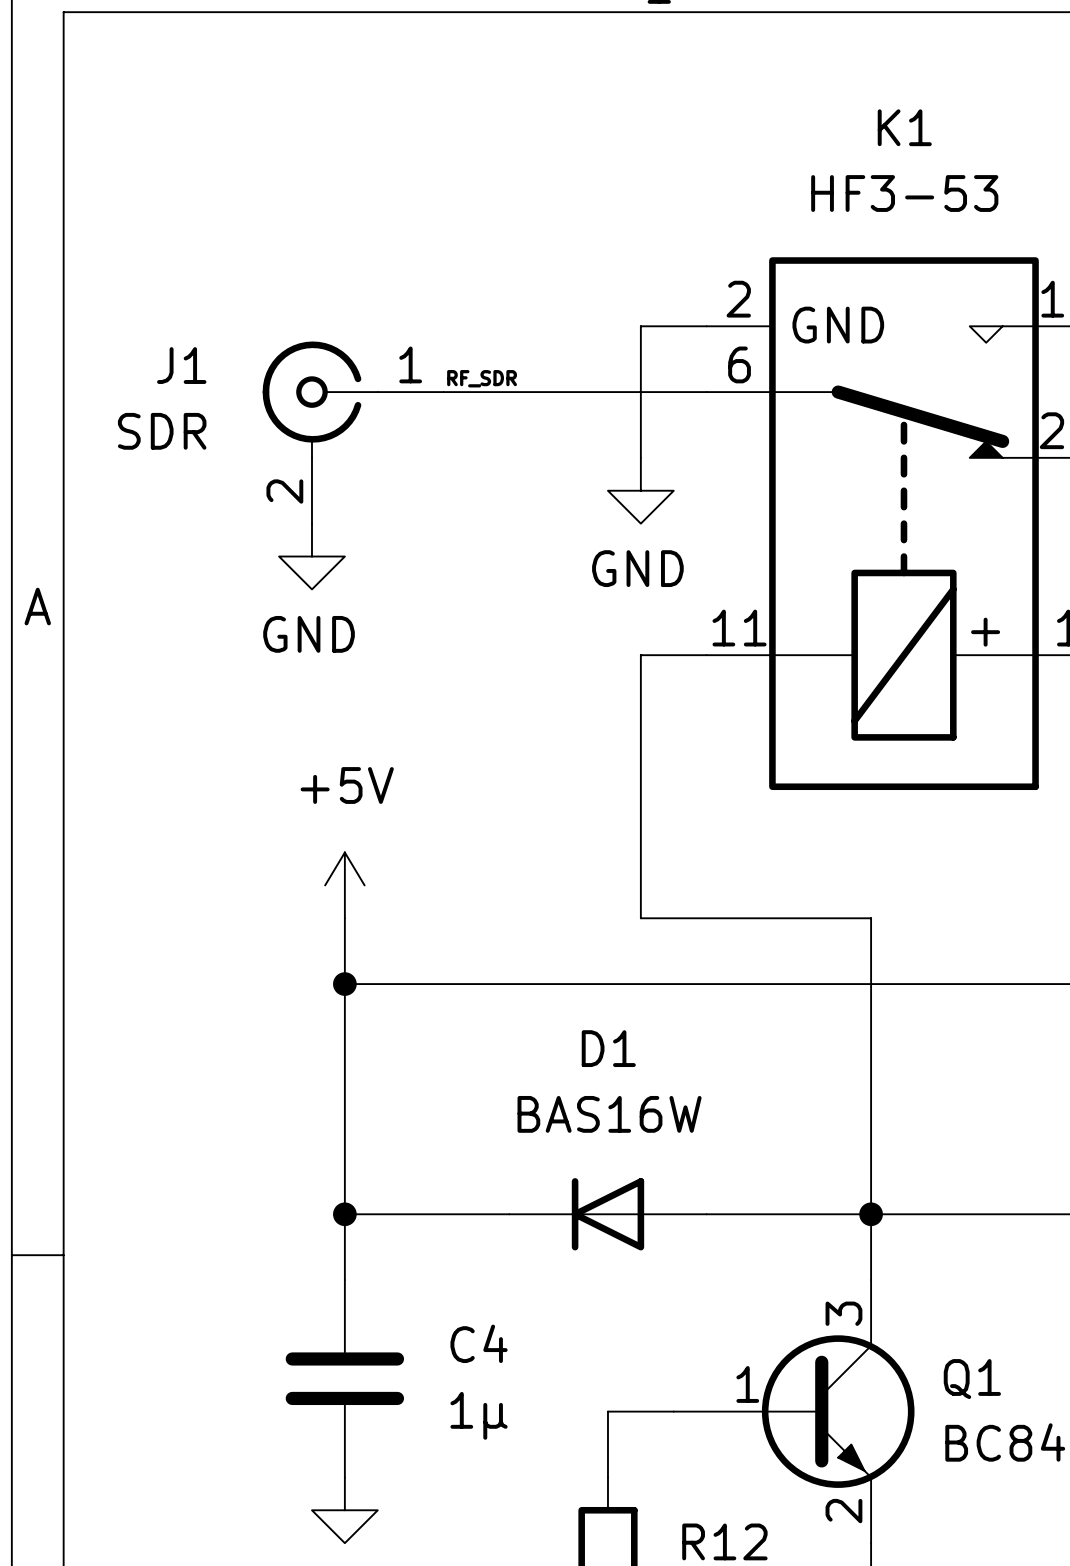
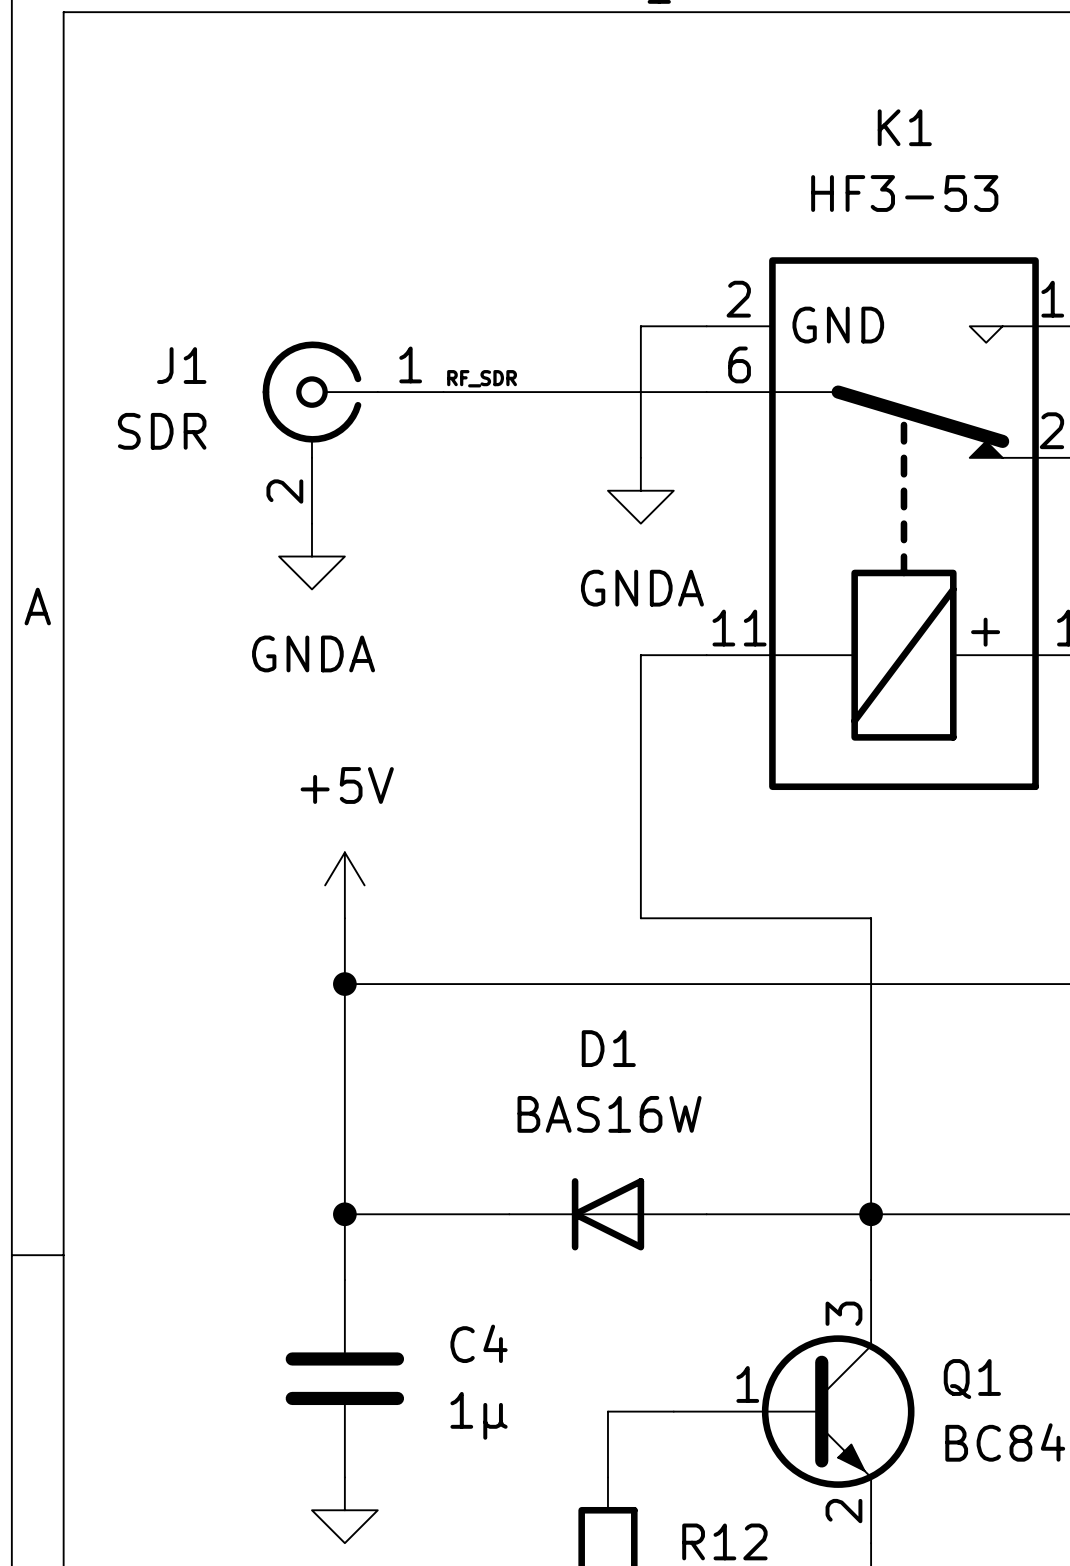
power symbol: GND (640, 490) -> GNDA (640, 490)
power symbol: GND (311, 556) -> GNDA (311, 556)

